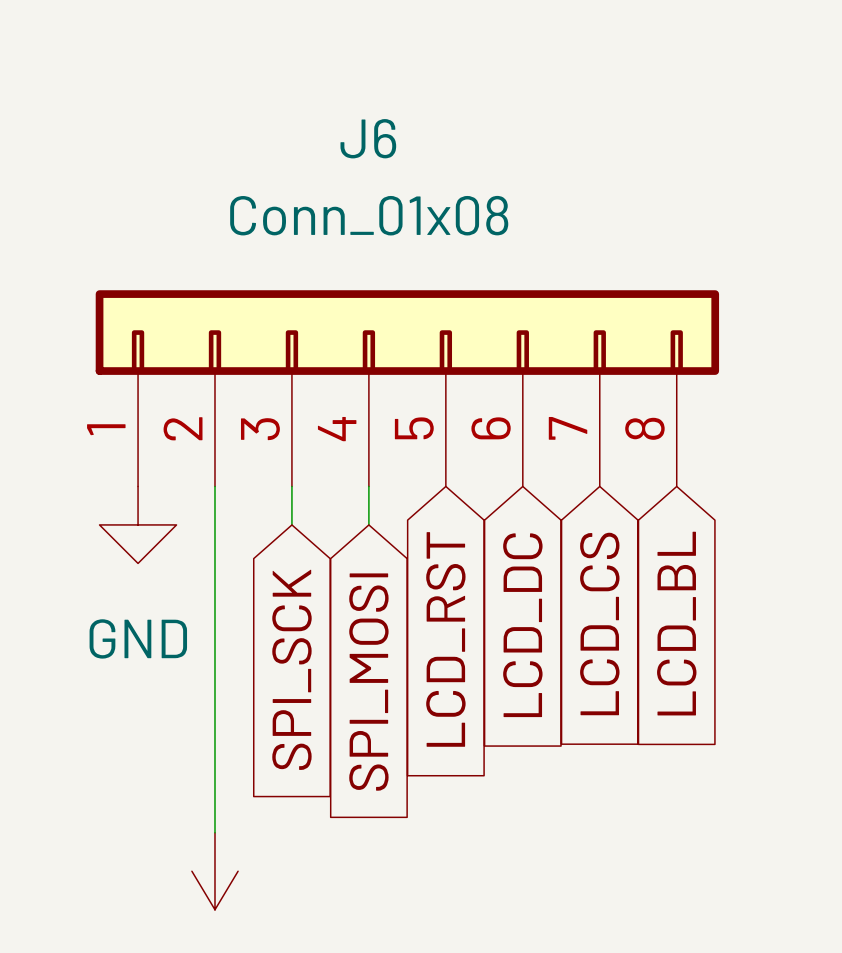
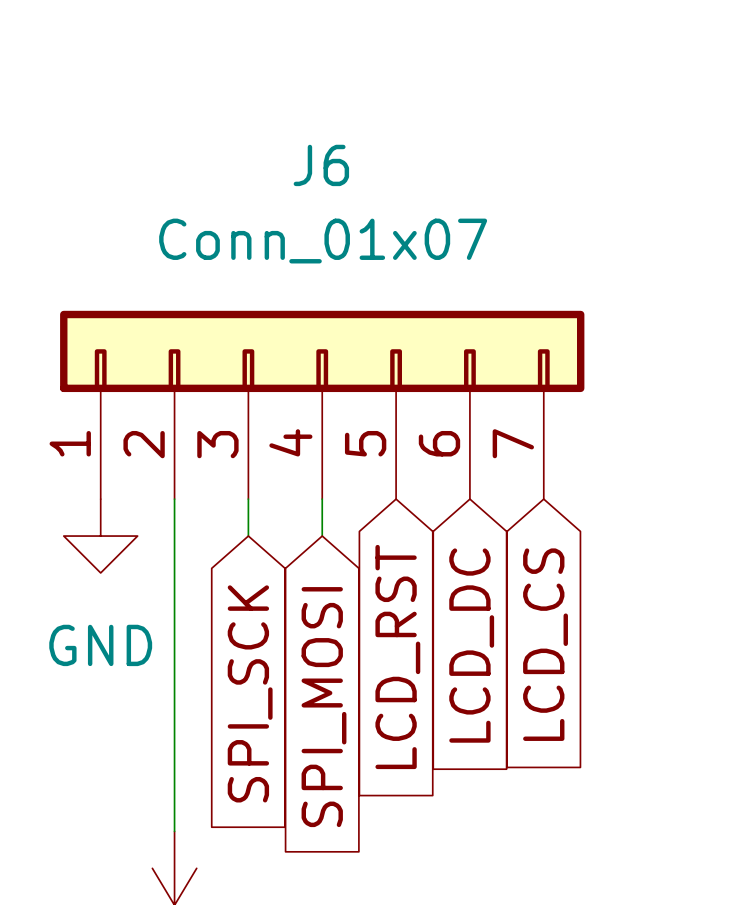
J6 value: Conn_01x08 (369, 215) -> Conn_01x07 (323, 241)
J6 symbol: [95, 290, 720, 487] -> [60, 310, 585, 500]
global label: LCD_BL (676, 623) -> none

